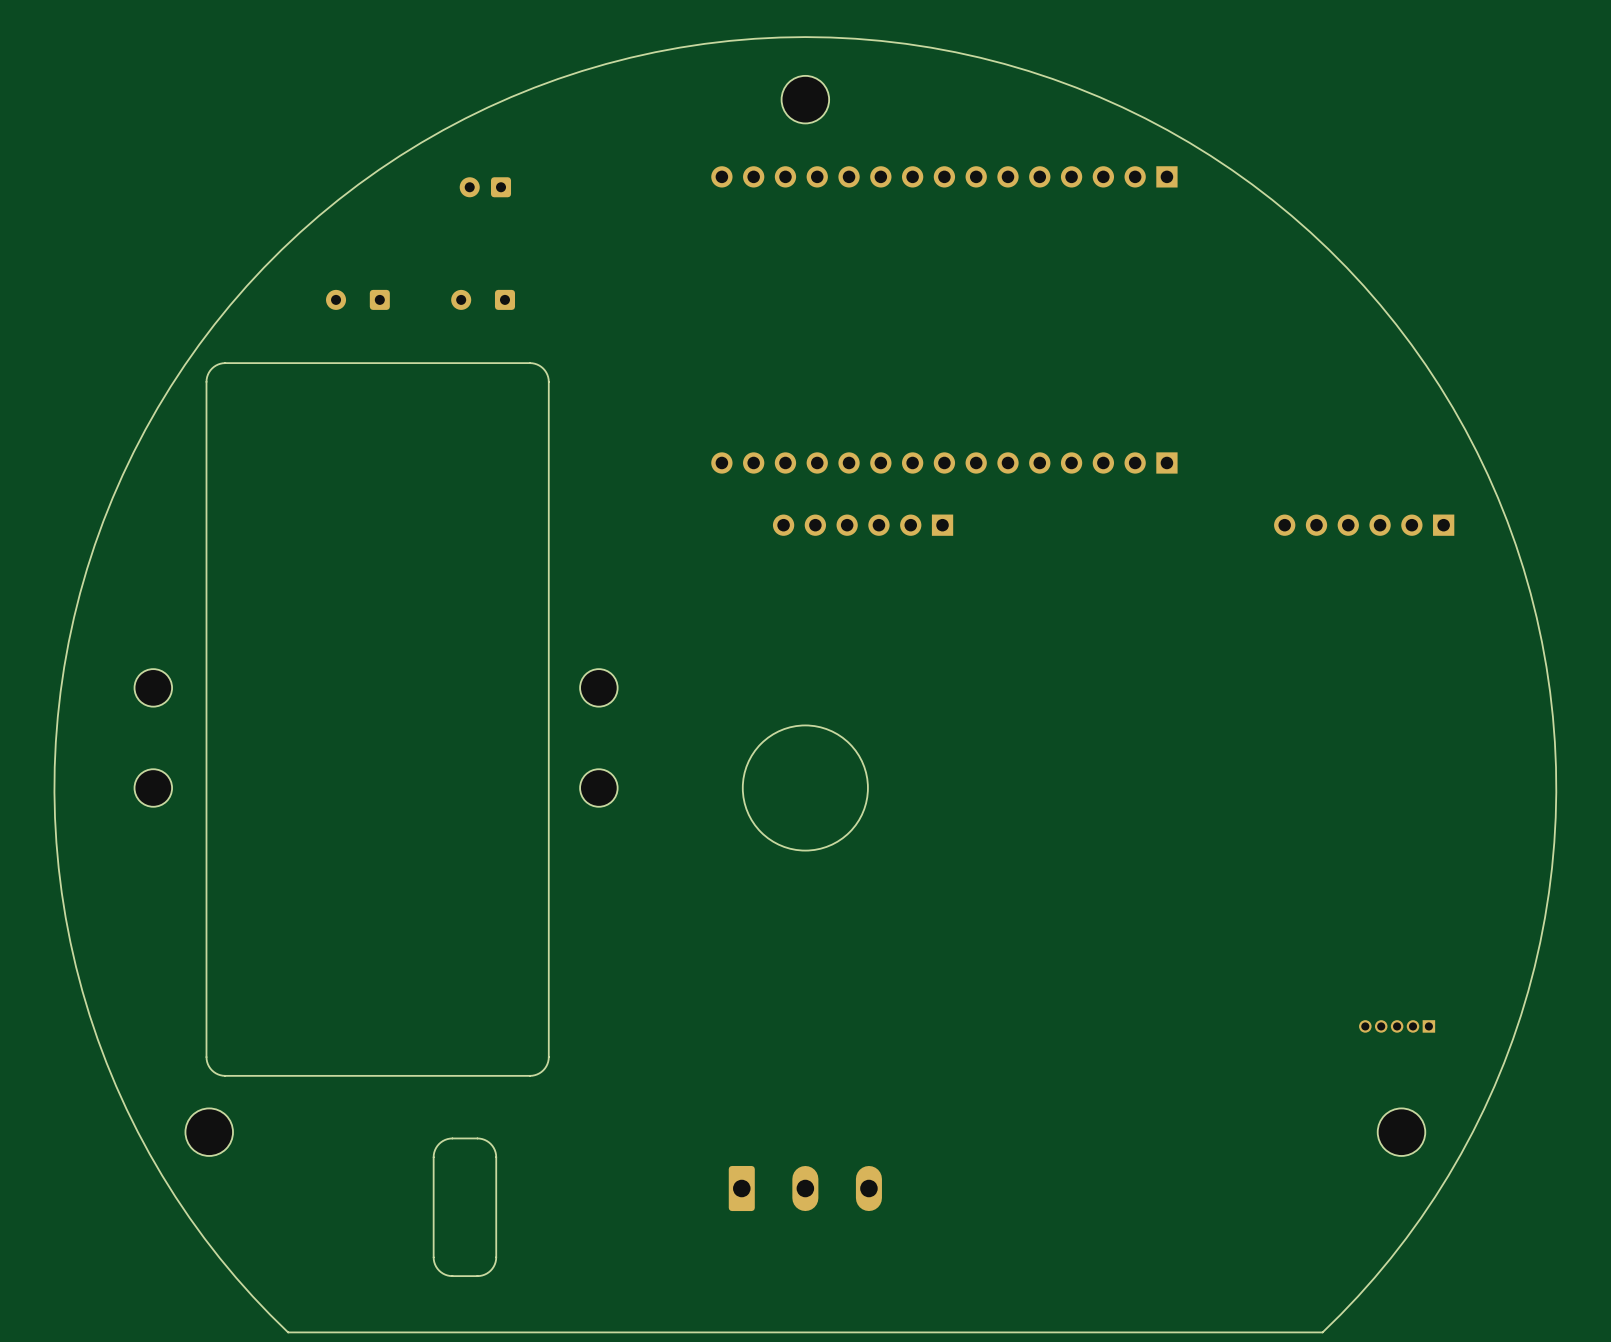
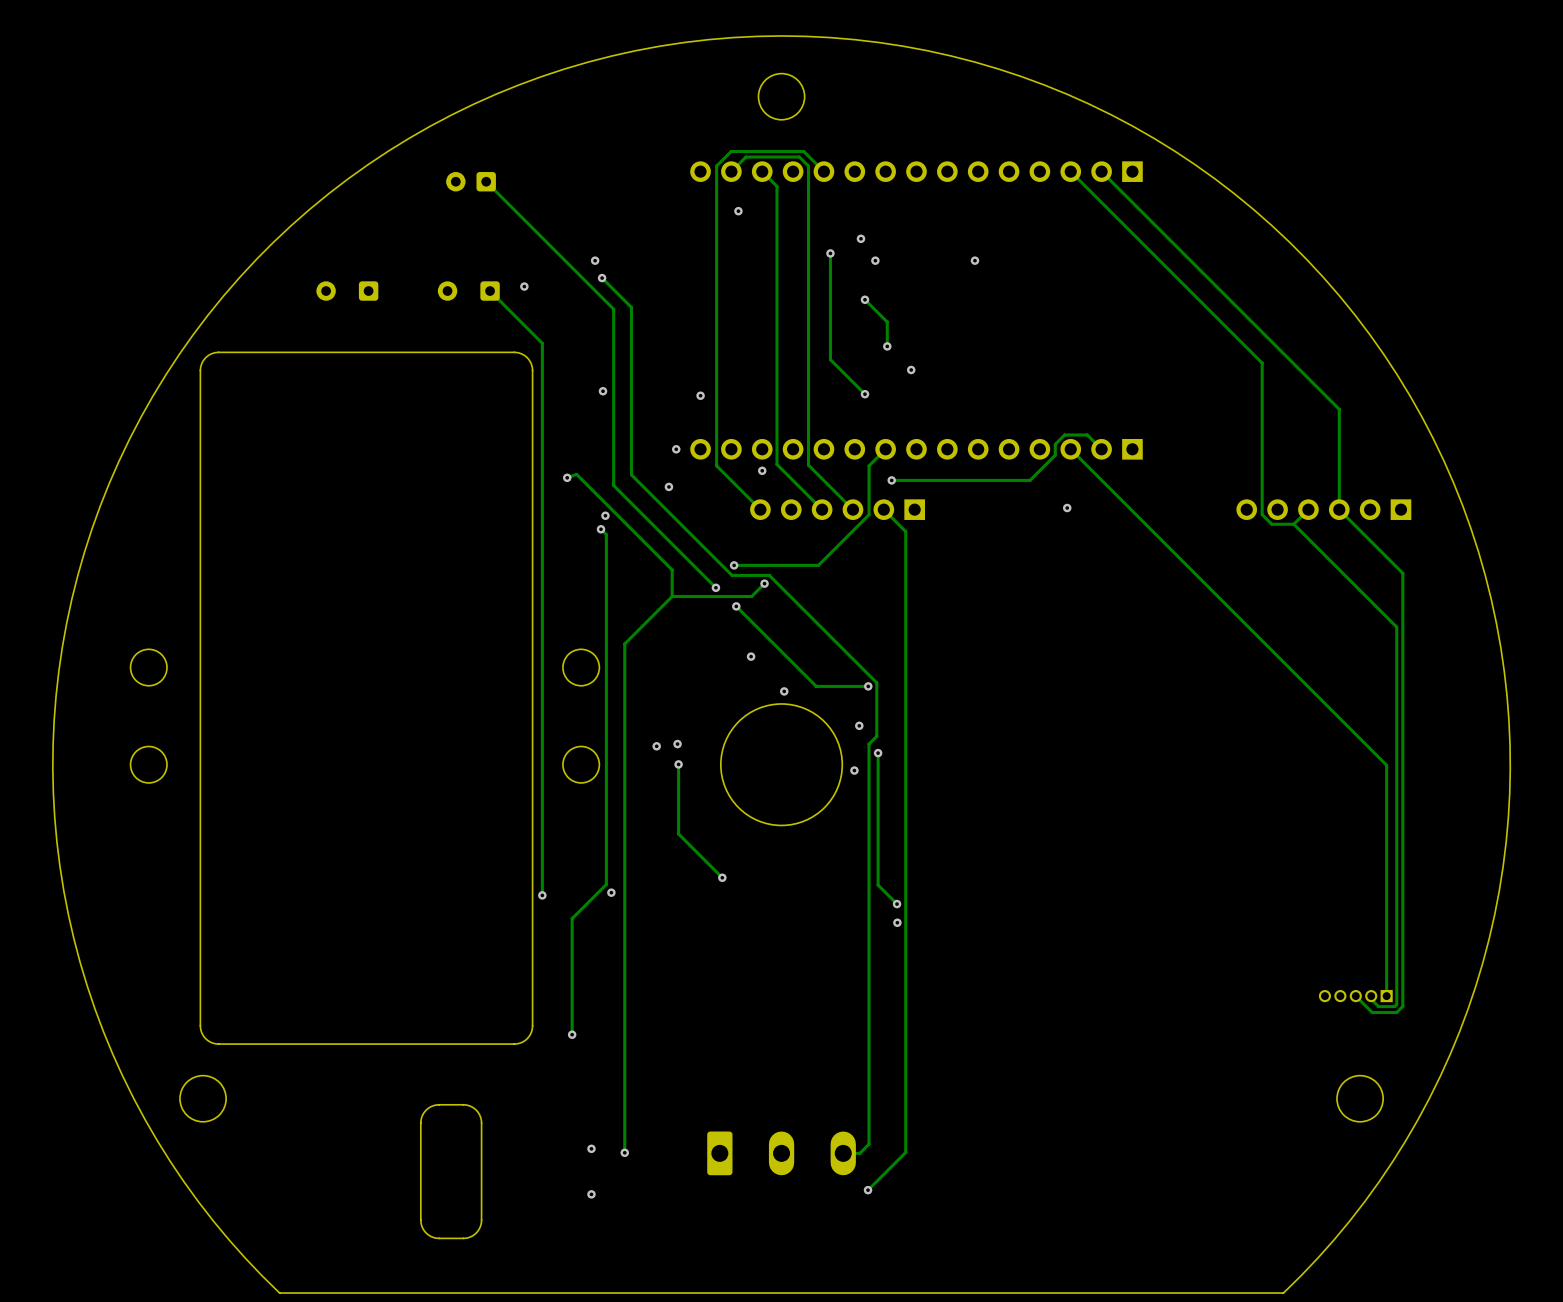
track: none -> (731, 171) (746, 157) (799, 157) (808, 166) (808, 465) (852, 509)
track: none -> (762, 171) (777, 186) (777, 464) (822, 509)
track: none -> (823, 171) (803, 151) (731, 151) (716, 166) (716, 465) (760, 509)
track: none -> (1070, 171) (1262, 363) (1262, 514) (1271, 524) (1293, 524)
track: none -> (1101, 171) (1339, 409) (1339, 509) (1402, 573) (1402, 1006) (1396, 1012) (1372, 1012) (1355, 996)
track: none -> (486, 181) (613, 309) (613, 485) (715, 587)
via: none -> (738, 211)
via: none -> (860, 238)
track: none -> (830, 253) (830, 359) (864, 394)
via: none -> (830, 253)
via: none -> (595, 260)
via: none -> (875, 260)
via: none -> (974, 260)
track: none -> (602, 278) (631, 307) (631, 474) (732, 575) (769, 575) (876, 682) (876, 736) (869, 744) (869, 1144) (859, 1153) (843, 1153)
via: none -> (602, 278)
via: none -> (524, 286)
track: none -> (490, 291) (542, 343) (542, 895)
track: none -> (864, 299) (887, 322) (887, 346)
via: none -> (864, 299)
via: none -> (887, 346)
via: none -> (911, 369)
via: none -> (603, 391)
via: none -> (864, 394)
via: none -> (700, 395)
via: none -> (676, 449)
track: none -> (885, 449) (869, 465) (869, 514) (818, 565) (734, 565)
track: none -> (1070, 449) (1386, 765) (1386, 996)
track: none -> (1101, 449) (1087, 435) (1064, 435) (1055, 444) (1055, 455) (1030, 480) (891, 480)
via: none -> (762, 470)
track: none -> (567, 477) (576, 474) (672, 569) (672, 596)
via: none -> (567, 477)
via: none -> (891, 480)
via: none -> (668, 486)
via: none -> (1067, 508)
track: none -> (883, 509) (905, 531) (905, 1152) (868, 1190)
track: none -> (1308, 509) (1293, 524)
via: none -> (605, 515)
track: none -> (1293, 524) (1396, 627) (1396, 1004) (1394, 1006) (1378, 1006) (1371, 999) (1371, 996)
track: none -> (601, 529) (606, 534) (606, 884) (572, 918) (572, 1034)
via: none -> (601, 529)
via: none -> (734, 565)
track: none -> (764, 583) (751, 596) (672, 596)
via: none -> (764, 583)
via: none -> (715, 587)
track: none -> (672, 596) (624, 643) (624, 1152)
track: none -> (736, 606) (816, 686) (868, 686)
via: none -> (736, 606)
via: none -> (751, 656)
via: none -> (868, 686)
via: none -> (784, 691)
via: none -> (859, 725)
via: none -> (677, 744)
via: none -> (656, 746)
track: none -> (878, 753) (878, 885) (897, 904)
via: none -> (878, 753)
track: none -> (678, 764) (678, 834) (722, 877)
via: none -> (678, 764)
via: none -> (854, 770)
via: none -> (722, 877)
via: none -> (611, 892)
via: none -> (542, 895)
via: none -> (897, 904)
via: none -> (897, 922)
via: none -> (572, 1034)
via: none -> (591, 1148)
via: none -> (624, 1152)
via: none -> (868, 1190)
via: none -> (591, 1194)

